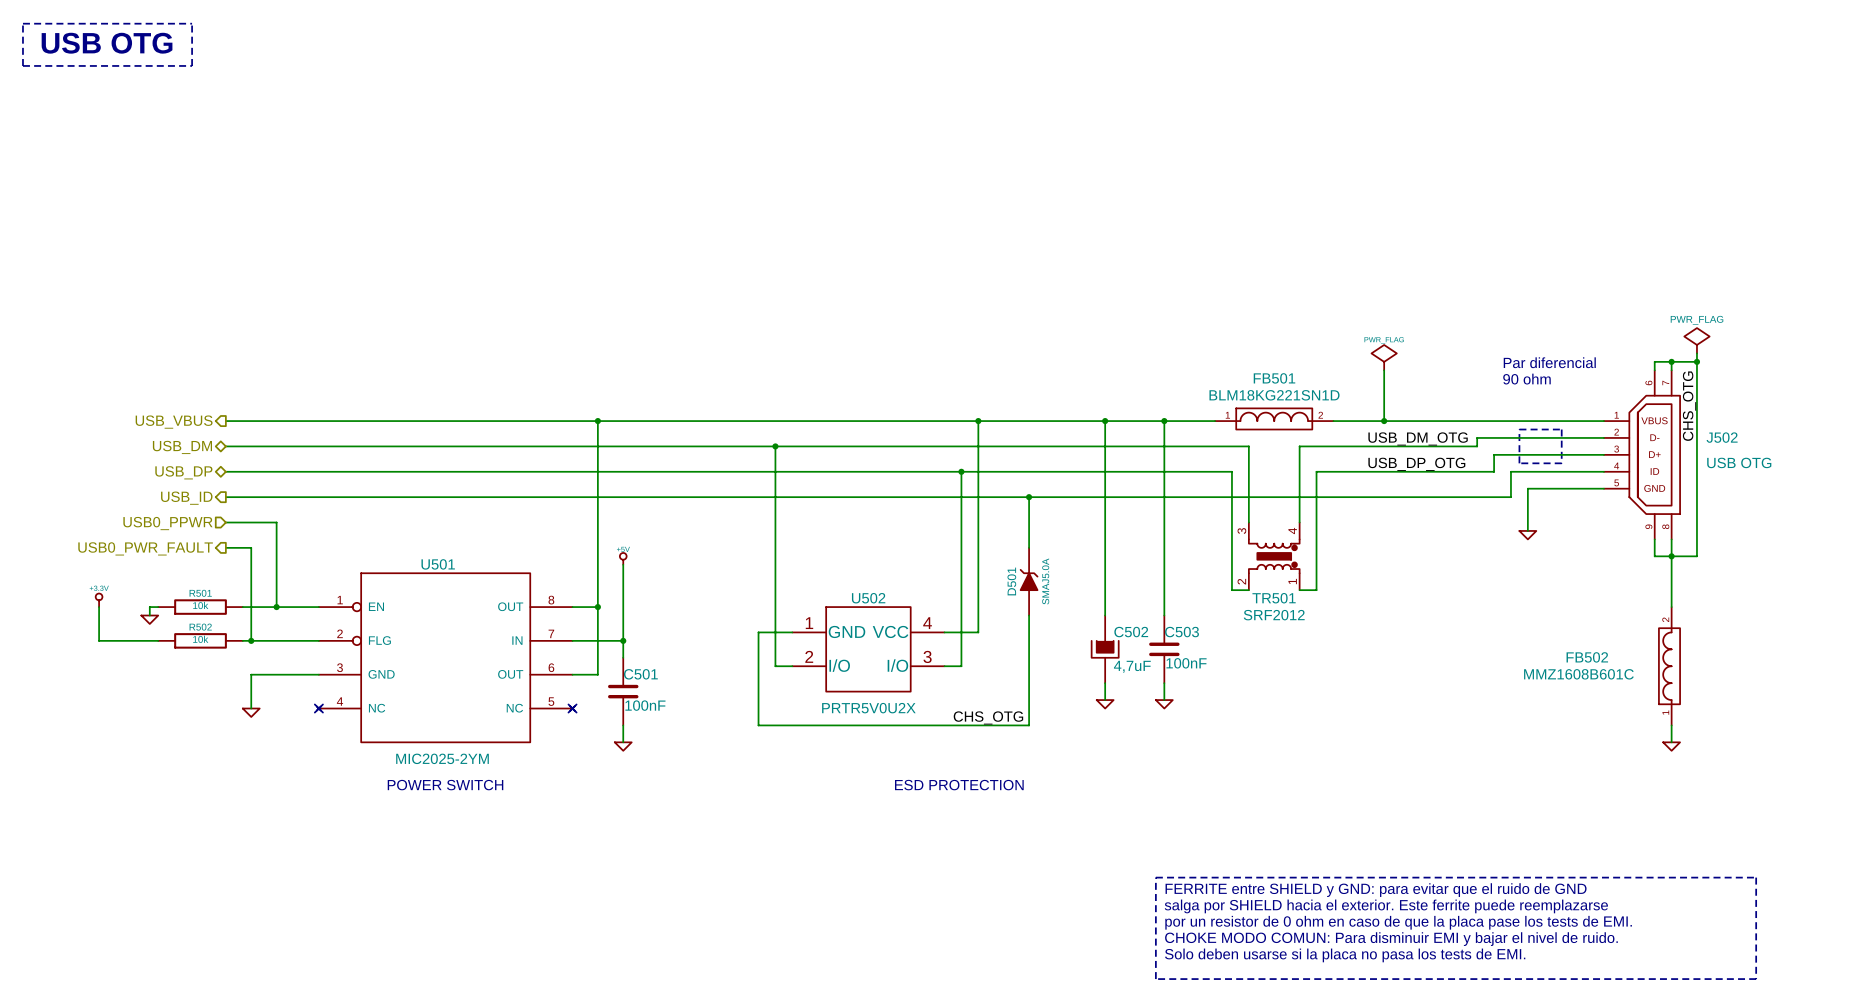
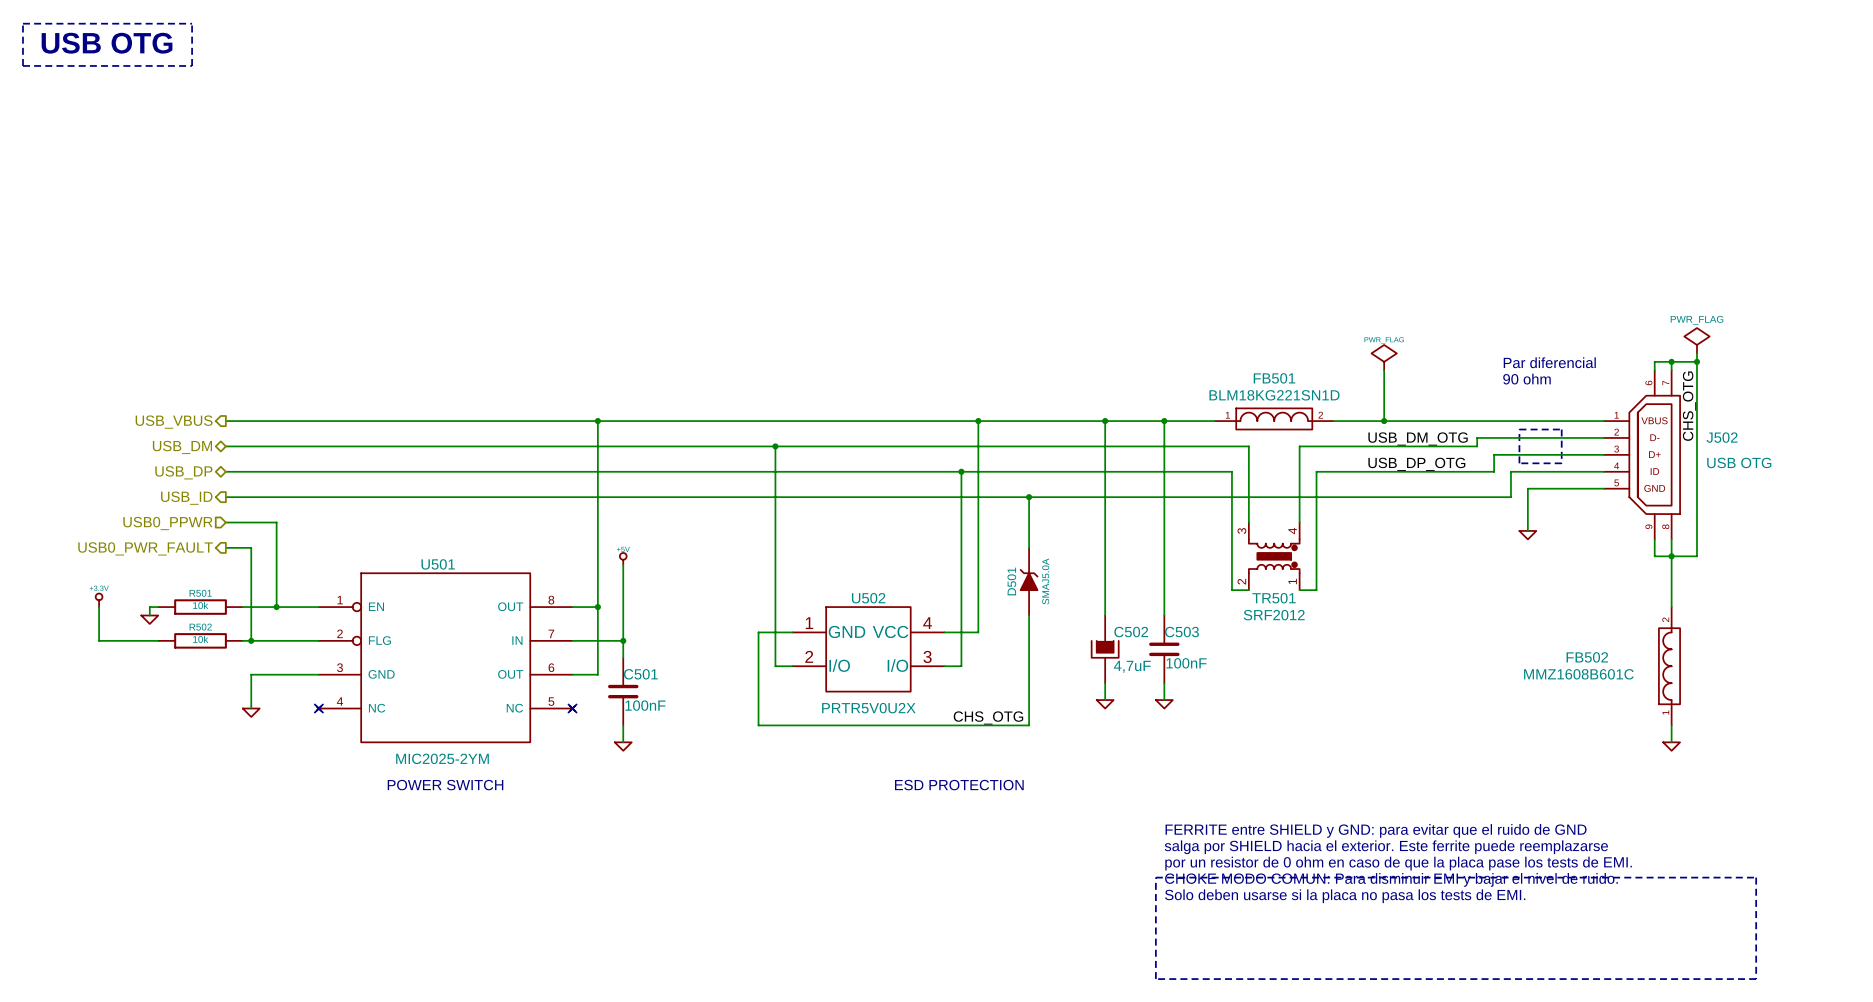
text position: FERRITE entre SHIELD y GND: para evitar que el ruido de GND (1376, 890) -> FERRITE entre SHIELD y GND: para evitar que el ruido de GND (1376, 830)
text position: salga por SHIELD hacia el exterior. Este ferrite puede reemplazarse (1386, 906) -> salga por SHIELD hacia el exterior. Este ferrite puede reemplazarse (1386, 847)
text position: por un resistor de 0 ohm en caso de que la placa pase los tests de EMI. (1398, 922) -> por un resistor de 0 ohm en caso de que la placa pase los tests de EMI. (1398, 863)
text position: CHOKE MODO COMUN: Para disminuir EMI y bajar el nivel de ruido. (1391, 939) -> CHOKE MODO COMUN: Para disminuir EMI y bajar el nivel de ruido. (1391, 879)
text position: Solo deben usarse si la placa no pasa los tests de EMI. (1345, 955) -> Solo deben usarse si la placa no pasa los tests de EMI. (1345, 896)

